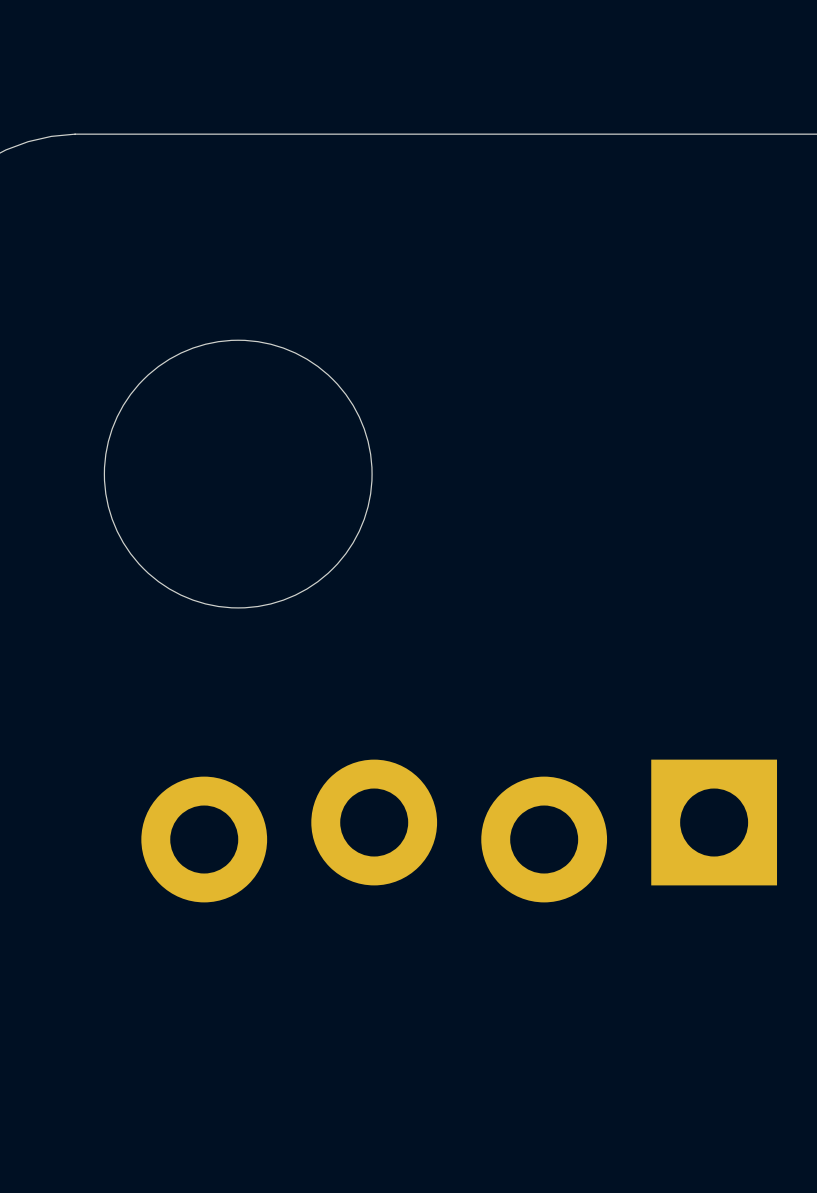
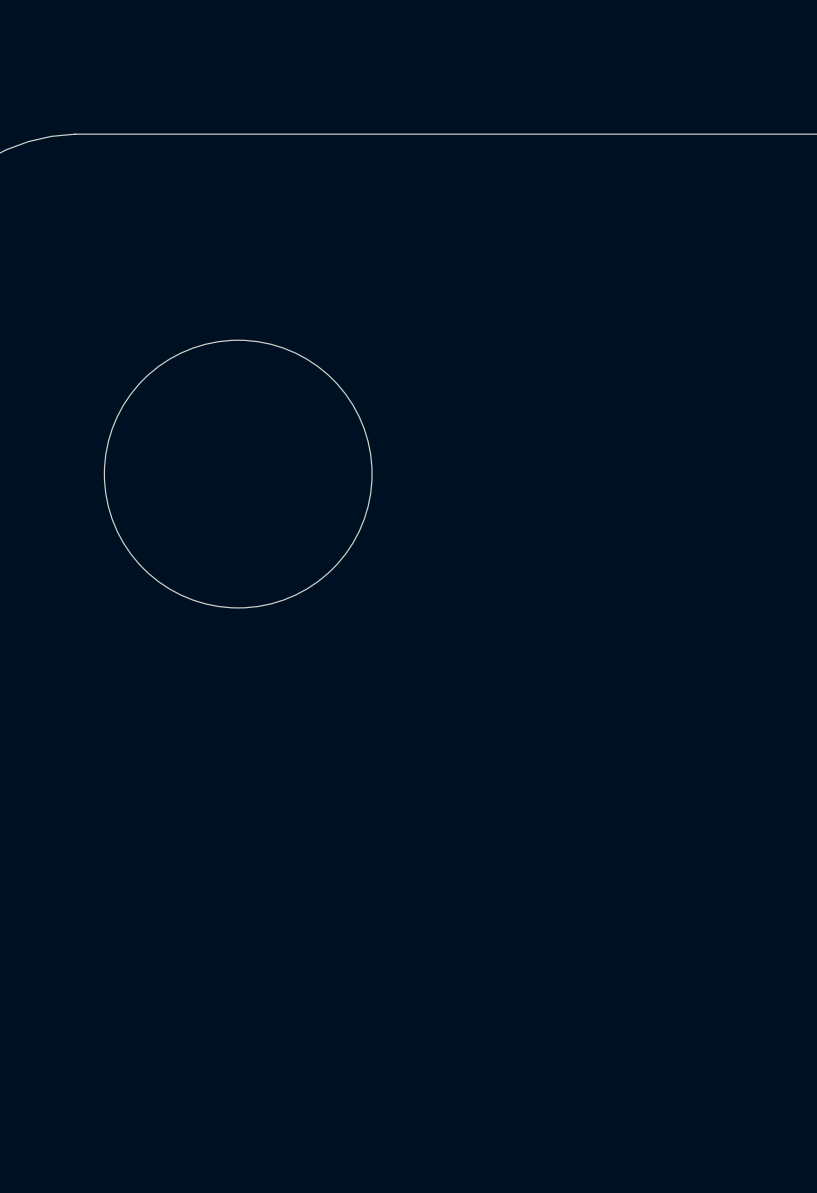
part: (459, 831) -> none

